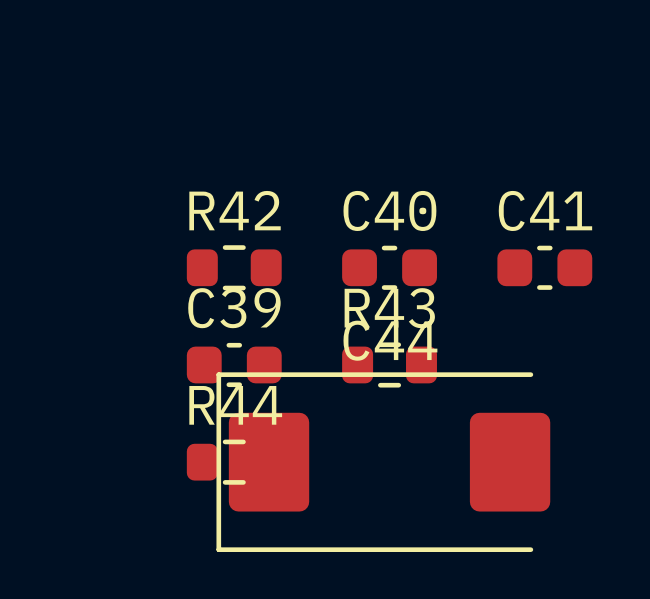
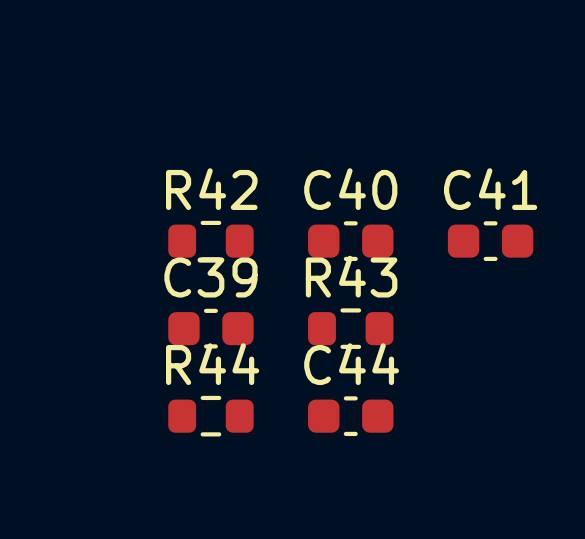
C44 footprint: [216, 372, 551, 553] -> [308, 396, 394, 437]

